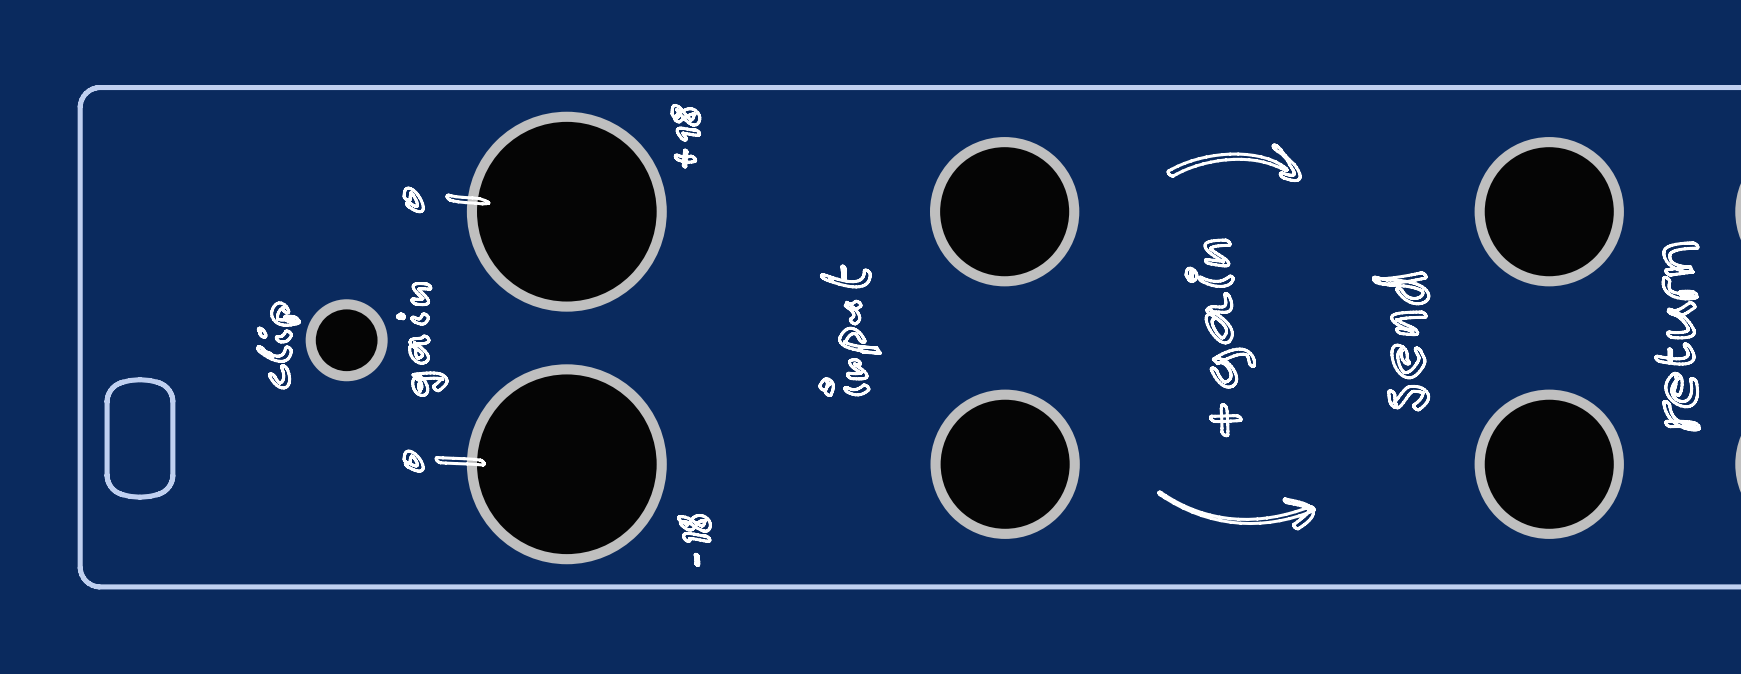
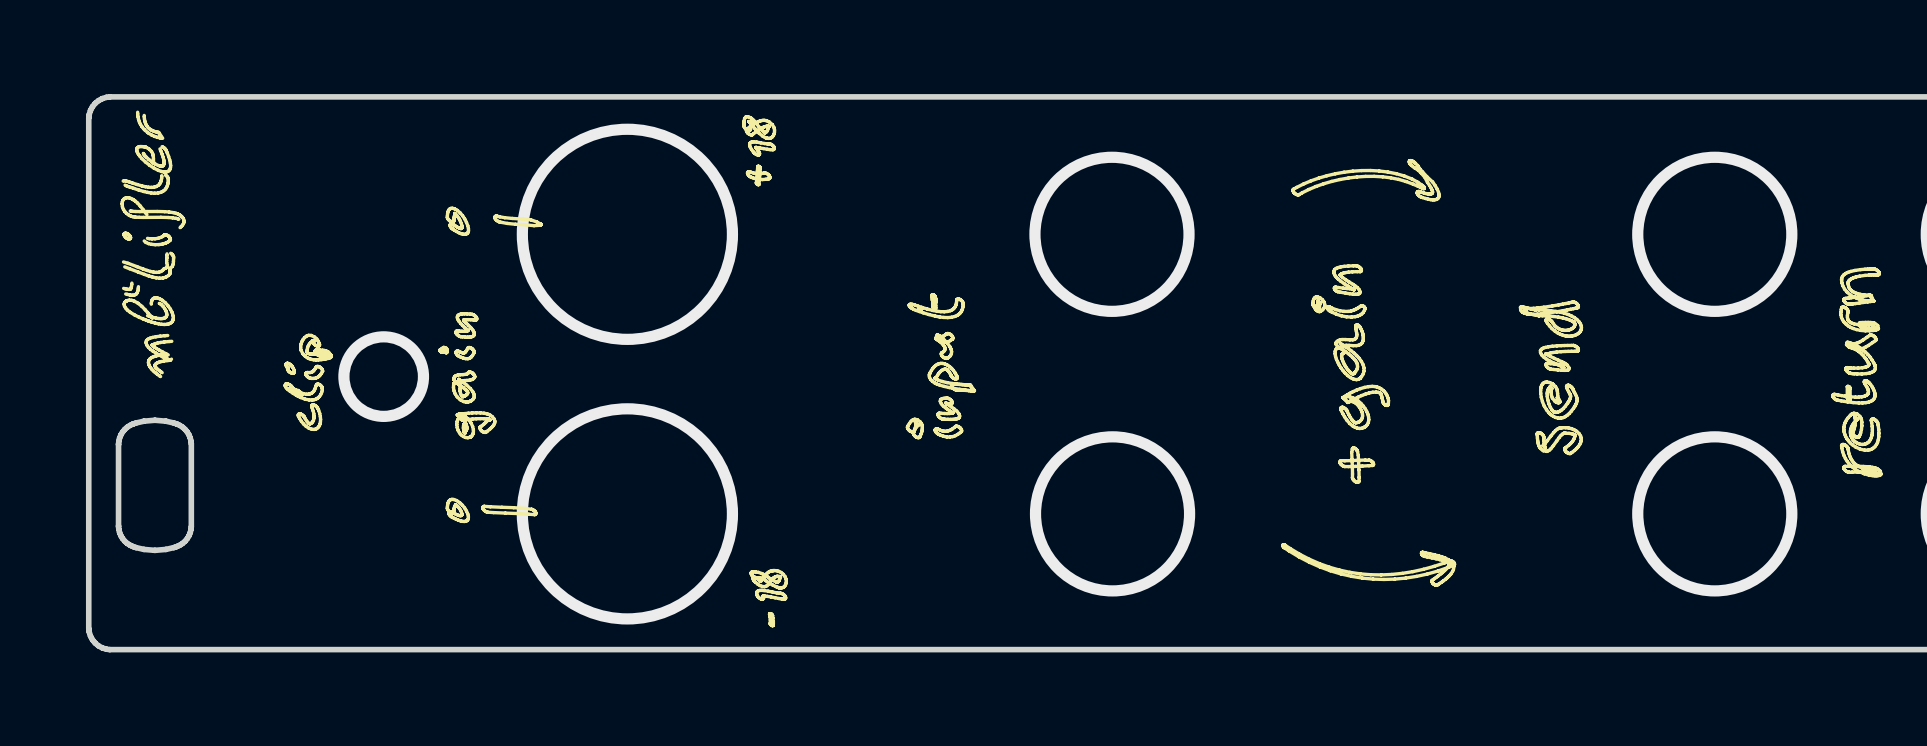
line: none -> (137, 112) (139, 121) (144, 129) (151, 135) (161, 138) (158, 132)
line: none -> (144, 115) (147, 127) (158, 132) (162, 138)
line: none -> (162, 146) (165, 149)
line: none -> (146, 147) (137, 147) (139, 155) (149, 165) (163, 171) (168, 170) (170, 167) (166, 150)
line: none -> (146, 147) (152, 153) (153, 163)
line: none -> (159, 148) (164, 162) (162, 166) (151, 161) (143, 153)
line: none -> (161, 175) (159, 184) (154, 187) (123, 181)
line: none -> (165, 175) (168, 178)
line: none -> (168, 178) (165, 189) (158, 193) (143, 191) (125, 185)
line: none -> (133, 199) (126, 197) (122, 201) (123, 209) (130, 216)
line: none -> (133, 200) (146, 214)
line: none -> (130, 210) (176, 213) (181, 216) (184, 220) (180, 227)
line: none -> (131, 216) (178, 219)
line: none -> (126, 233) (124, 234) (126, 238)
line: none -> (127, 233) (130, 237) (127, 238)
line: none -> (168, 235) (164, 234) (158, 238) (147, 238)
line: none -> (168, 236) (170, 240) (162, 244) (151, 244) (144, 240)
line: none -> (170, 253) (173, 256)
line: none -> (167, 253) (167, 267) (158, 272) (150, 271) (123, 261)
line: none -> (173, 257) (170, 273) (162, 278) (152, 276) (124, 266)
line: none -> (131, 283) (130, 289) (123, 288)
line: none -> (138, 286) (136, 294) (125, 293)
line: none -> (126, 301) (131, 300) (137, 303) (152, 318)
line: none -> (126, 301) (124, 303) (127, 310) (148, 321)
line: none -> (151, 304) (154, 298) (162, 300) (170, 309) (173, 318) (171, 322) (166, 324) (149, 321)
line: none -> (159, 303) (165, 310) (165, 317) (158, 318) (147, 315)
line: none -> (167, 335) (149, 338) (145, 342) (150, 349) (168, 359) (166, 354)
line: none -> (171, 341) (152, 344)
line: none -> (152, 345) (168, 354)
line: none -> (165, 354) (153, 356) (148, 360) (150, 367) (160, 376)
line: none -> (171, 359) (159, 362) (154, 365)
line: none -> (155, 366) (162, 372)

